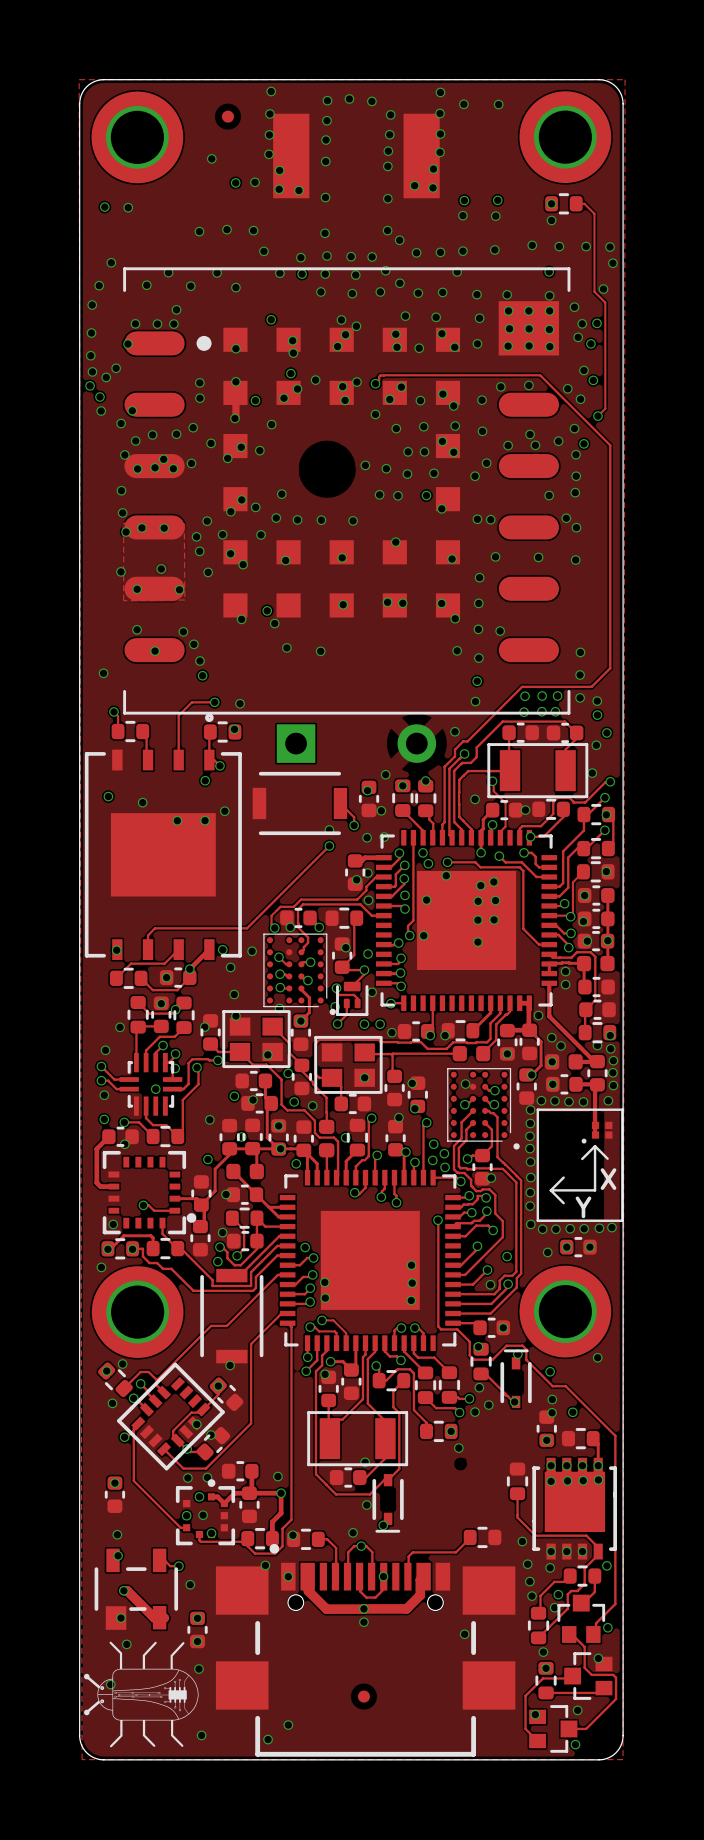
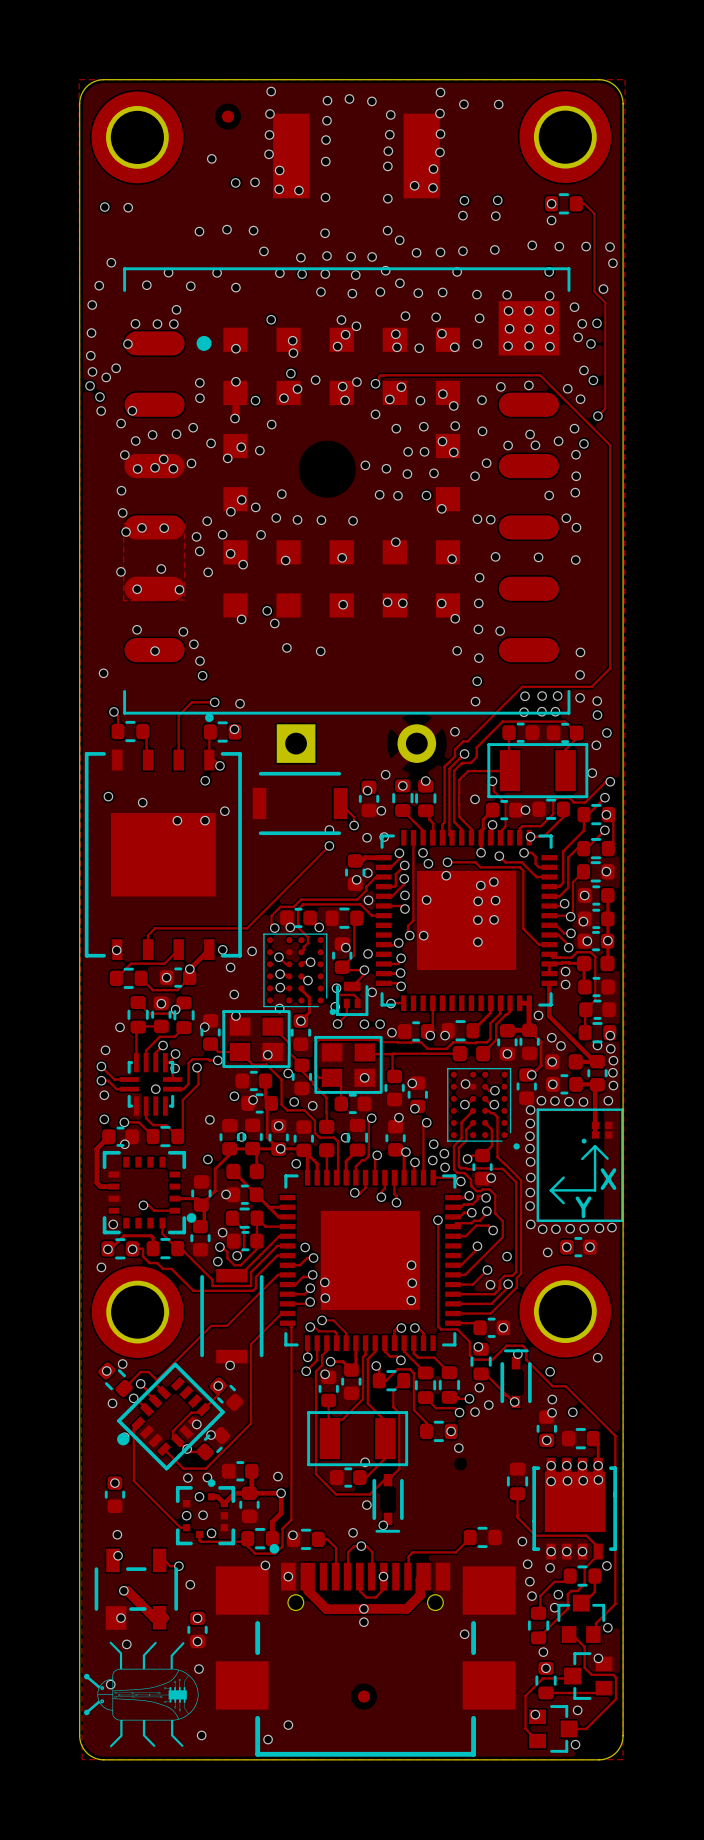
part footprint: [117, 1362, 225, 1471] -> [117, 1362, 225, 1471]

